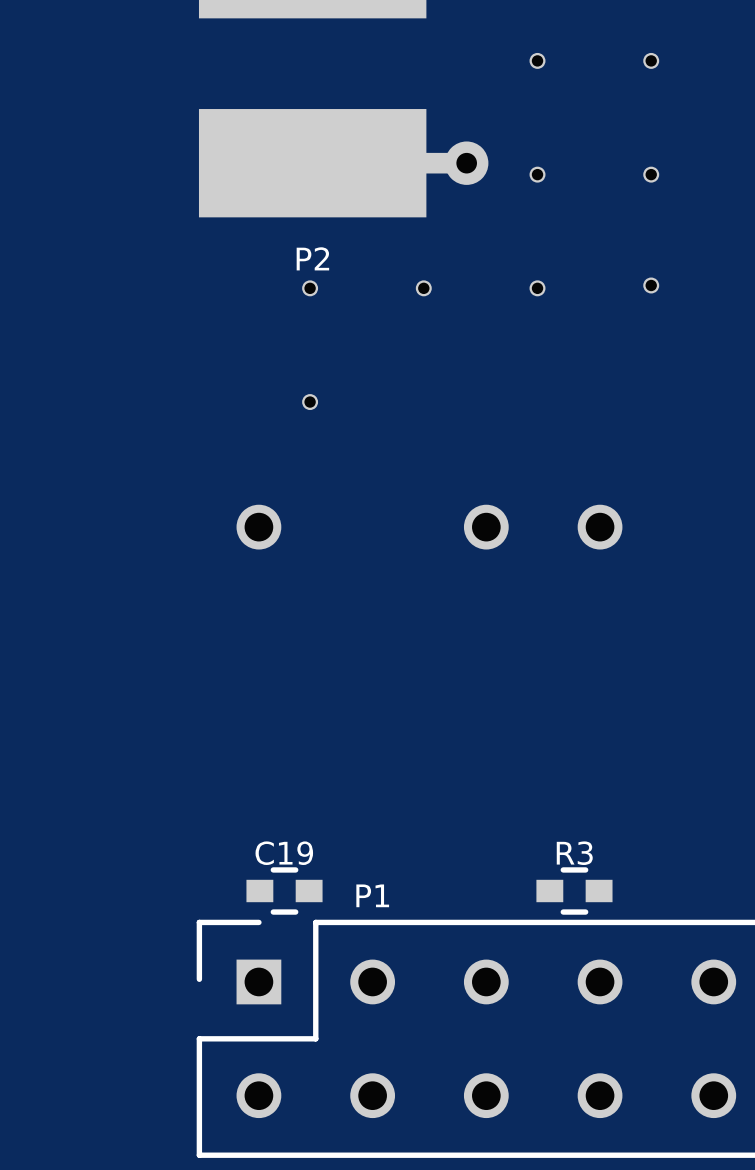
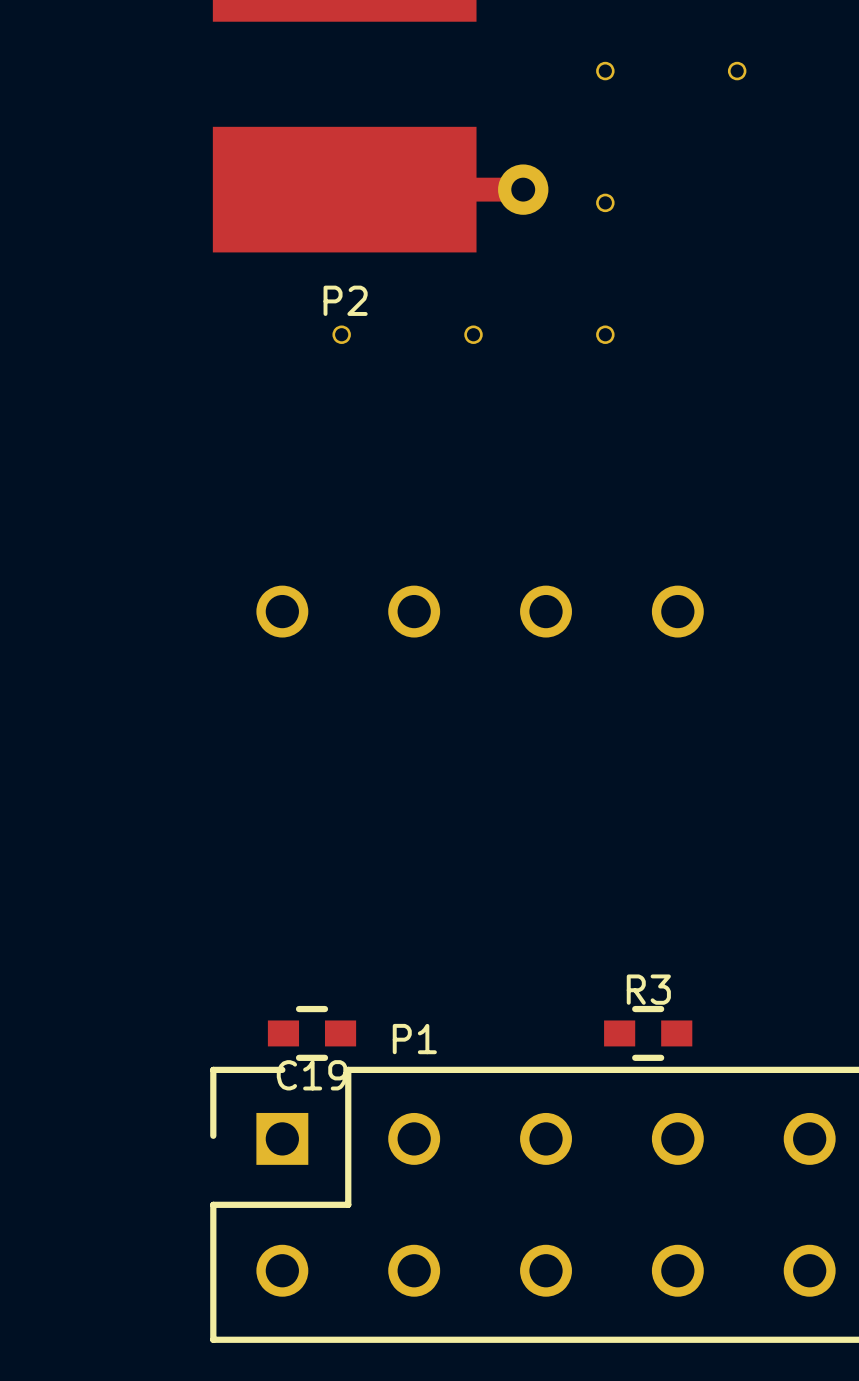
part: (651, 174) -> none
part: (651, 285) -> none
part: (310, 402) -> none
part: none -> (414, 611)
C19 name position: C19 (284, 853) -> C19 (312, 1075)

